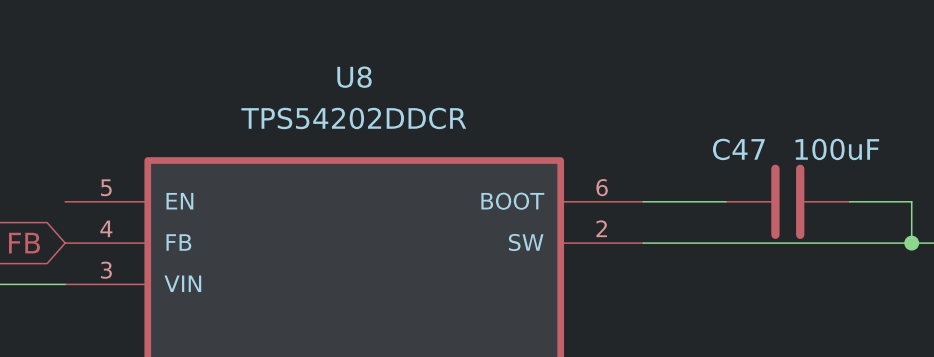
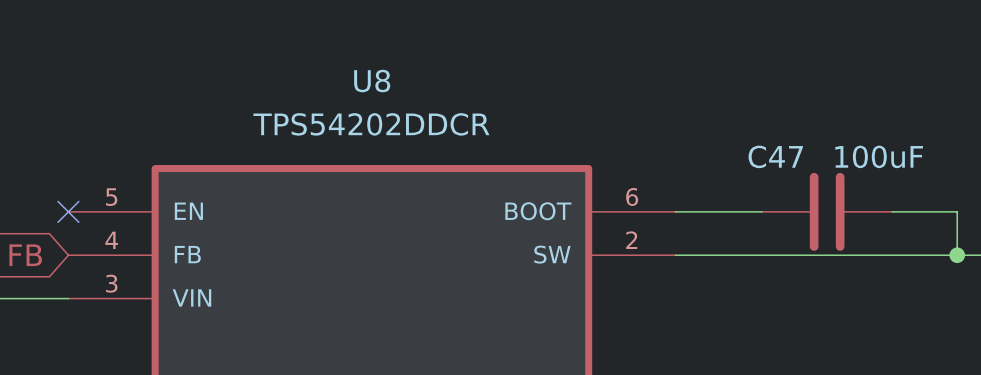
no-connect mark: none -> (68, 211)

